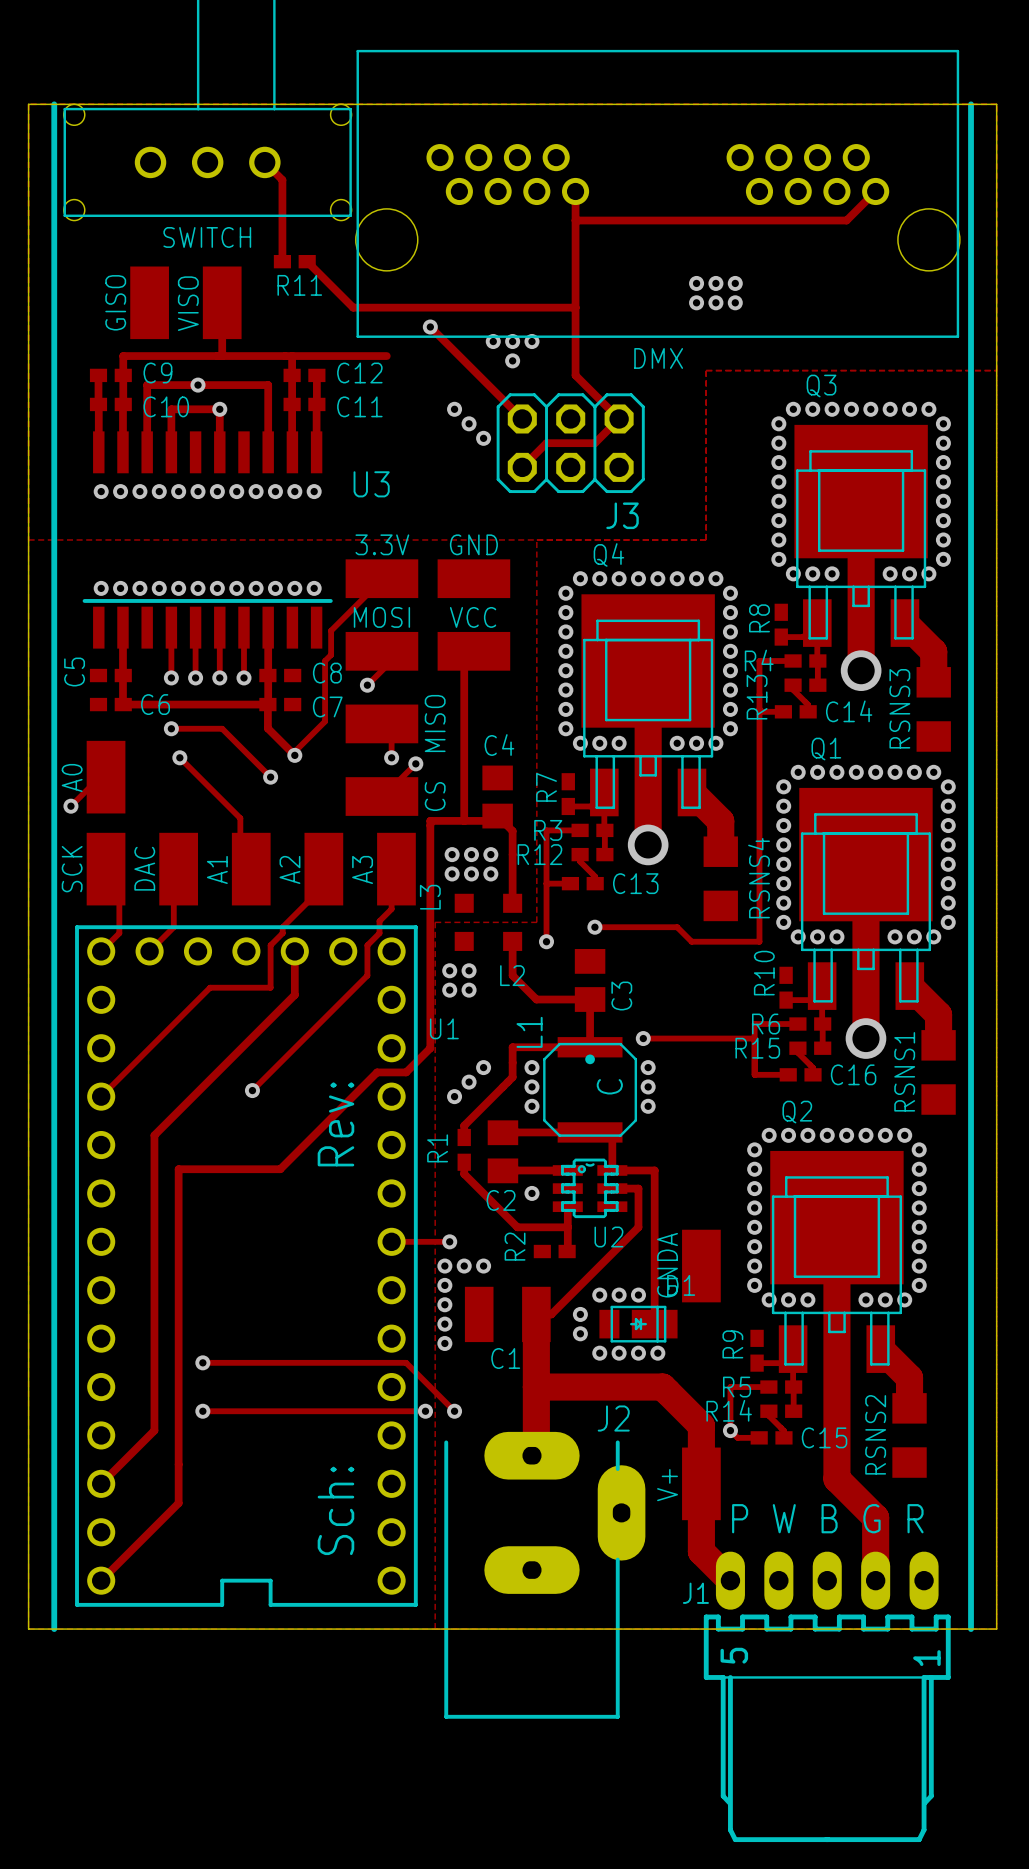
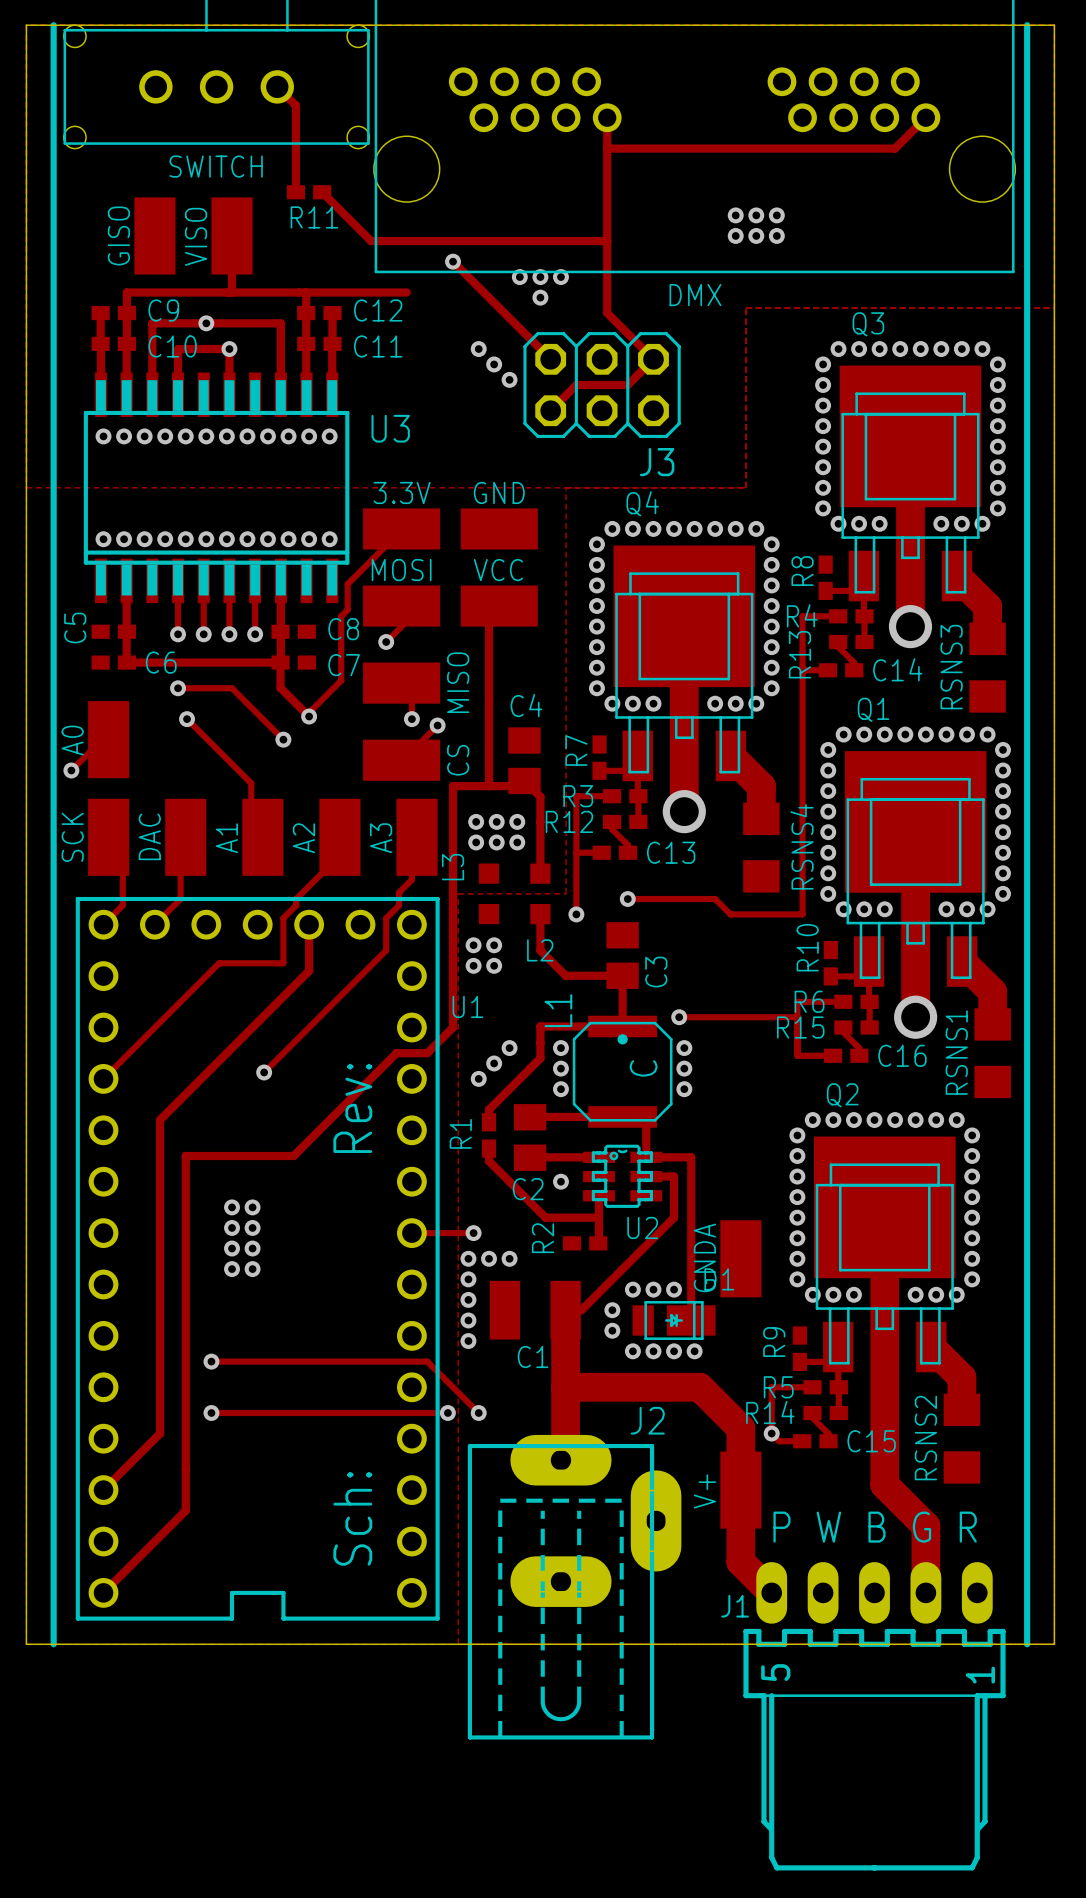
U3 footprint: [82, 431, 333, 649] -> [83, 372, 350, 604]
via: none -> (232, 1207)
via: none -> (252, 1207)
via: none -> (232, 1227)
via: none -> (252, 1227)
via: none -> (232, 1248)
via: none -> (252, 1248)
via: none -> (232, 1269)
via: none -> (252, 1269)
J2 footprint: [444, 1431, 646, 1719] -> [467, 1434, 682, 1740]

